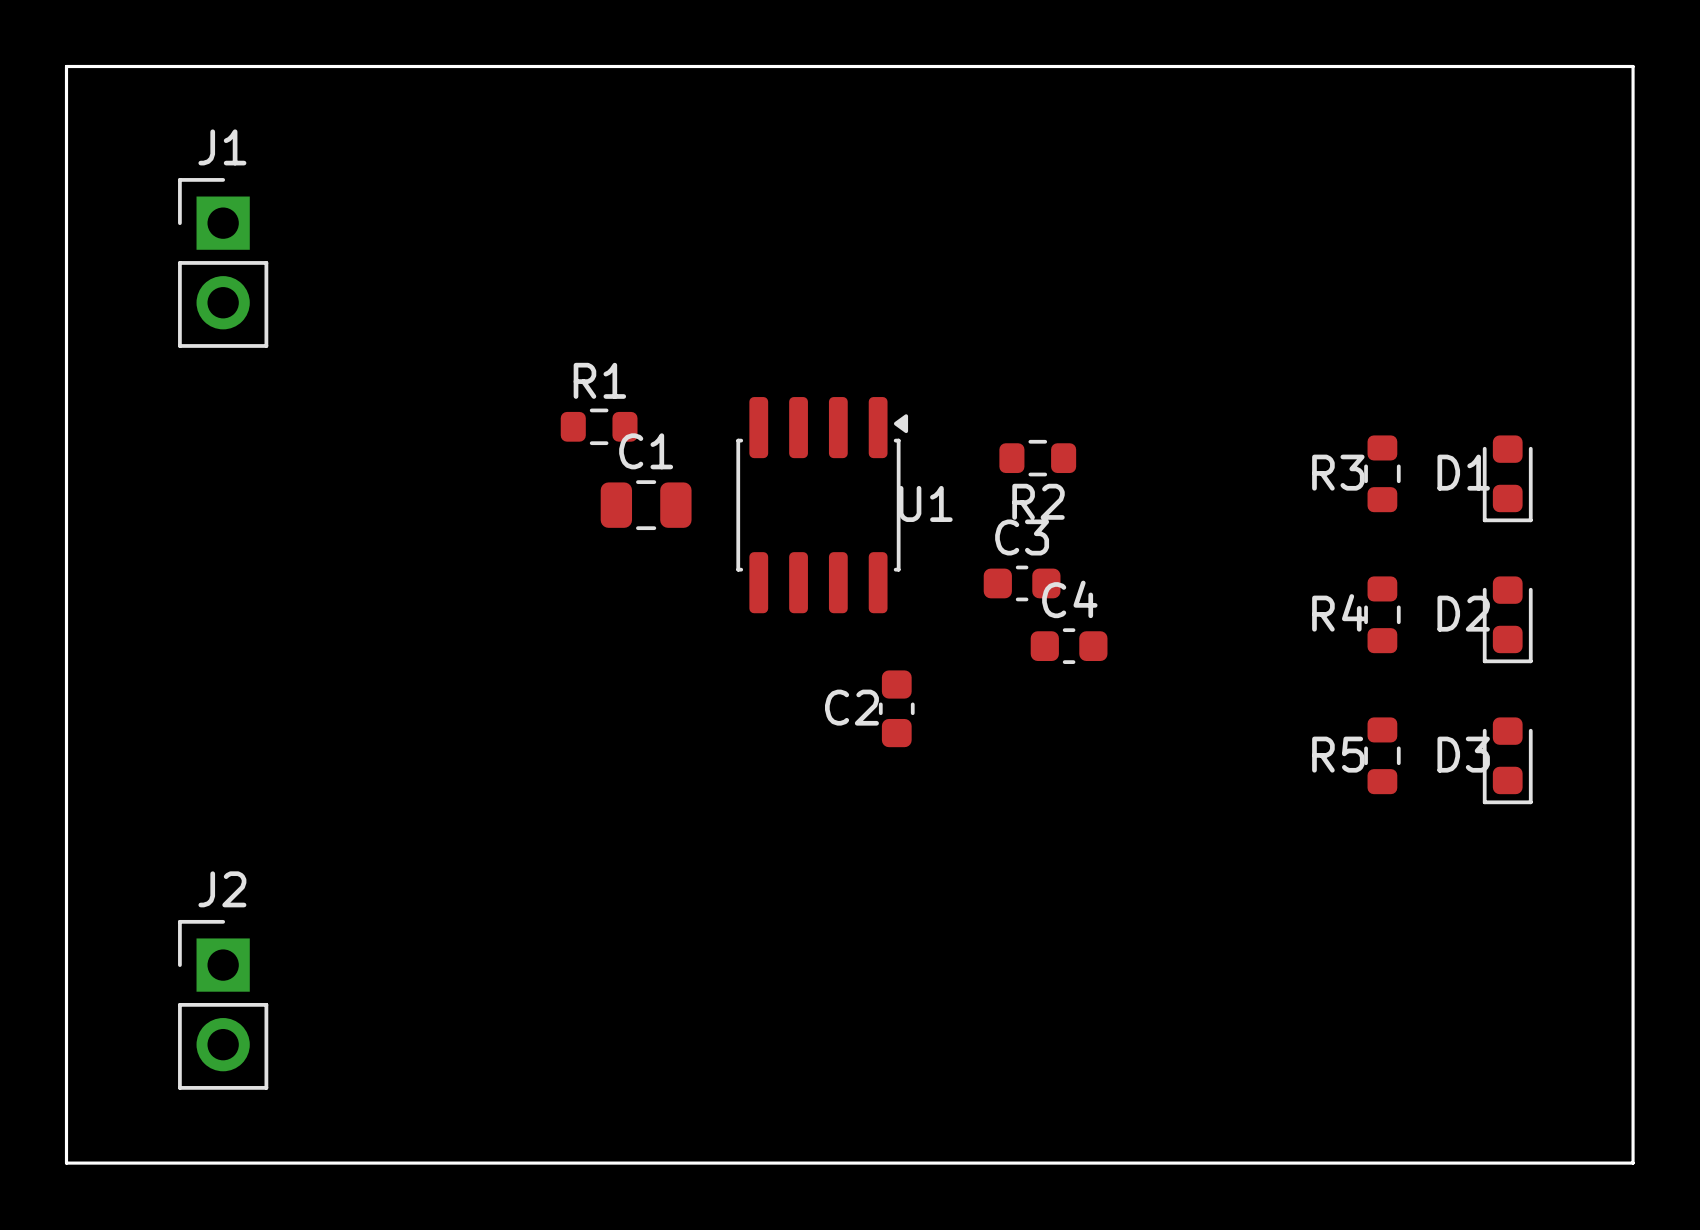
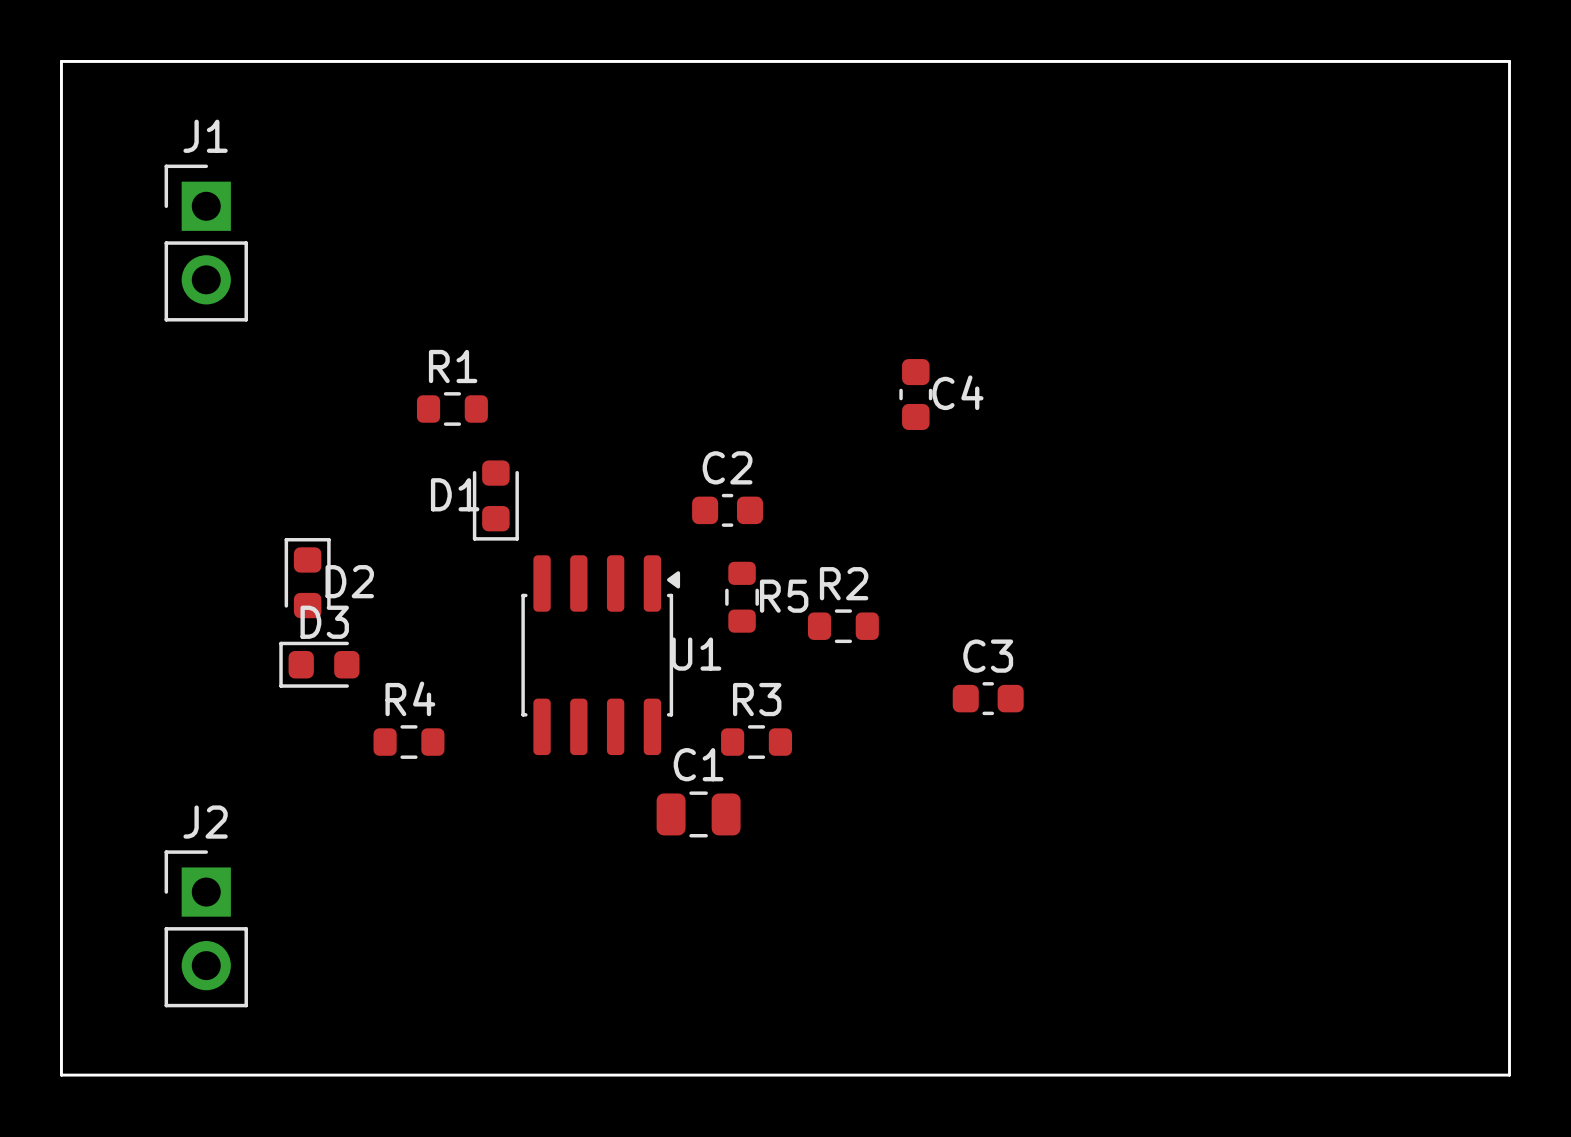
R1 position: (599, 426) -> (452, 408)
R2 position: (1037, 458) -> (843, 626)
R3 rotation: 0° (1382, 473) -> 90° clockwise (756, 742)
R3 position: (1382, 473) -> (756, 742)
D1 position: (1507, 478) -> (495, 500)
R2 name position: R2 (1038, 501) -> R2 (844, 583)
C1 position: (646, 505) -> (698, 814)
U1 position: (822, 505) -> (600, 655)
C3 position: (1022, 583) -> (988, 698)
R4 rotation: 0° (1382, 614) -> 90° clockwise (408, 742)
R4 position: (1382, 614) -> (408, 742)
D2 rotation: 0° (1507, 619) -> 180° (307, 578)
D2 position: (1507, 619) -> (307, 578)
C4 rotation: 0° (1069, 646) -> 90° clockwise (915, 394)
C4 position: (1069, 646) -> (915, 394)
C2 rotation: 0° (896, 708) -> 90° clockwise (727, 510)
C2 position: (896, 708) -> (727, 510)
R5 name position: R5 (1338, 754) -> R5 (784, 596)
R5 position: (1382, 755) -> (742, 597)
D3 rotation: 0° (1507, 760) -> 90° clockwise (319, 664)
D3 position: (1507, 760) -> (319, 664)

